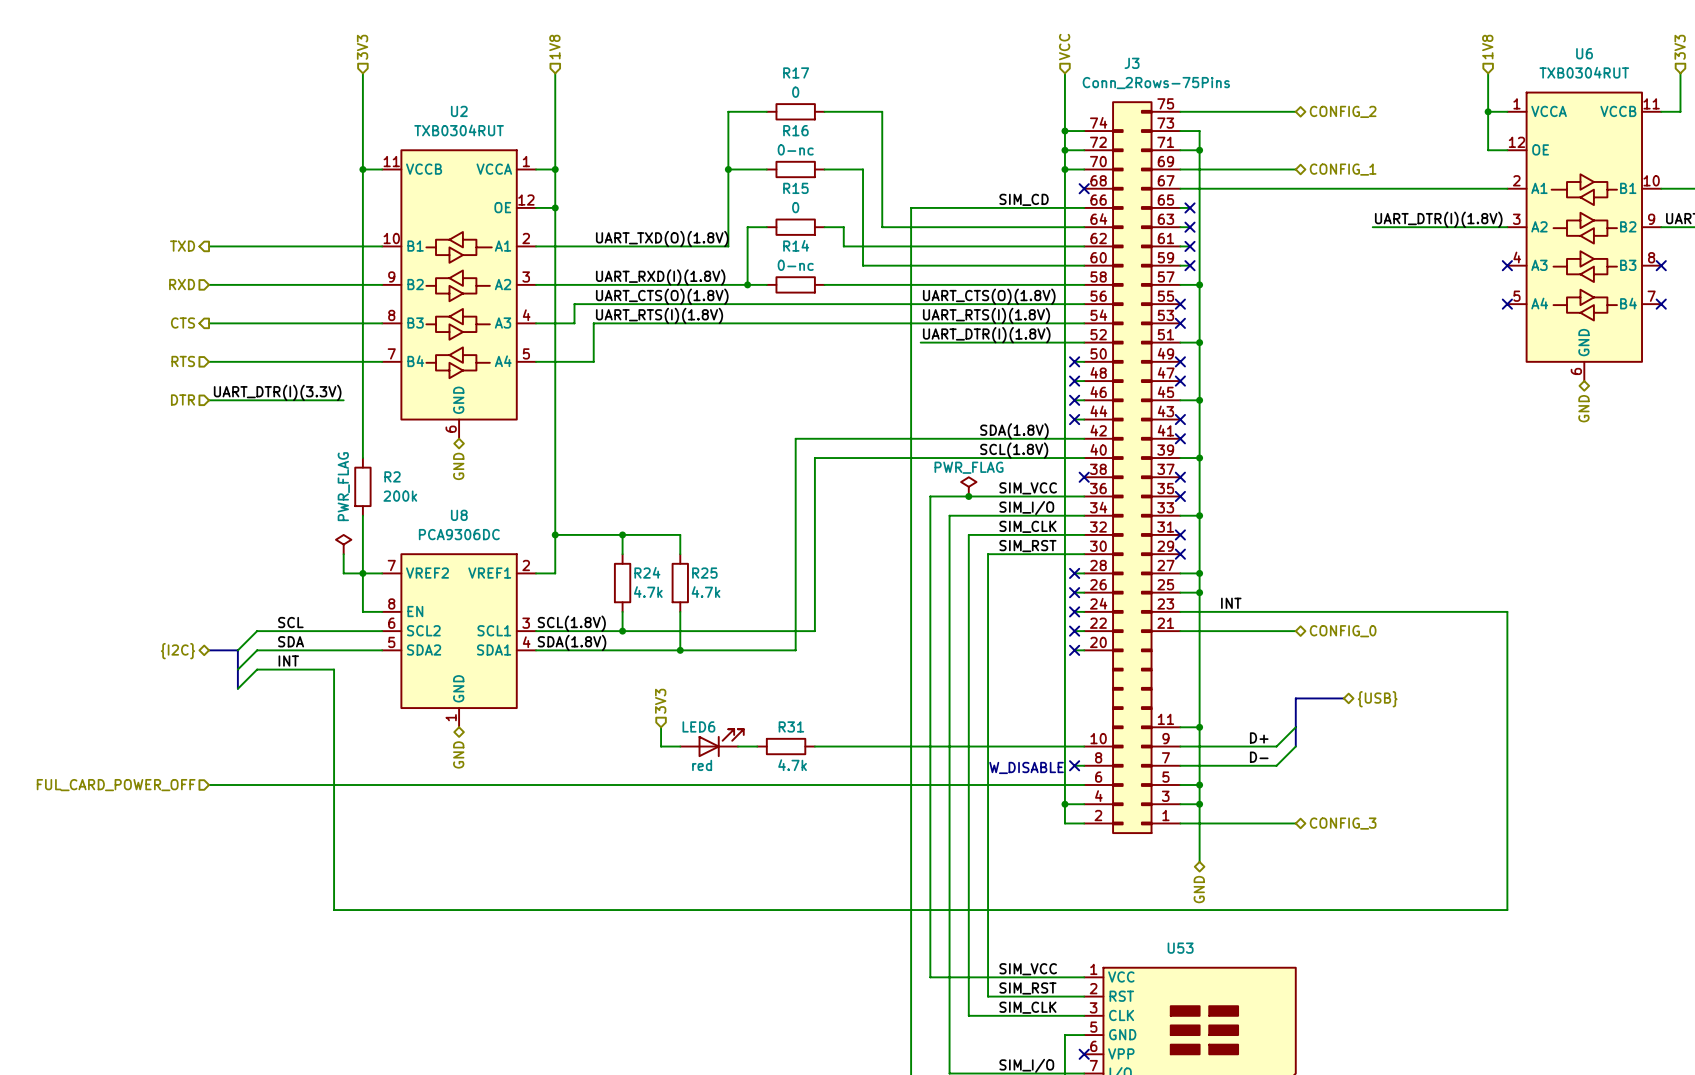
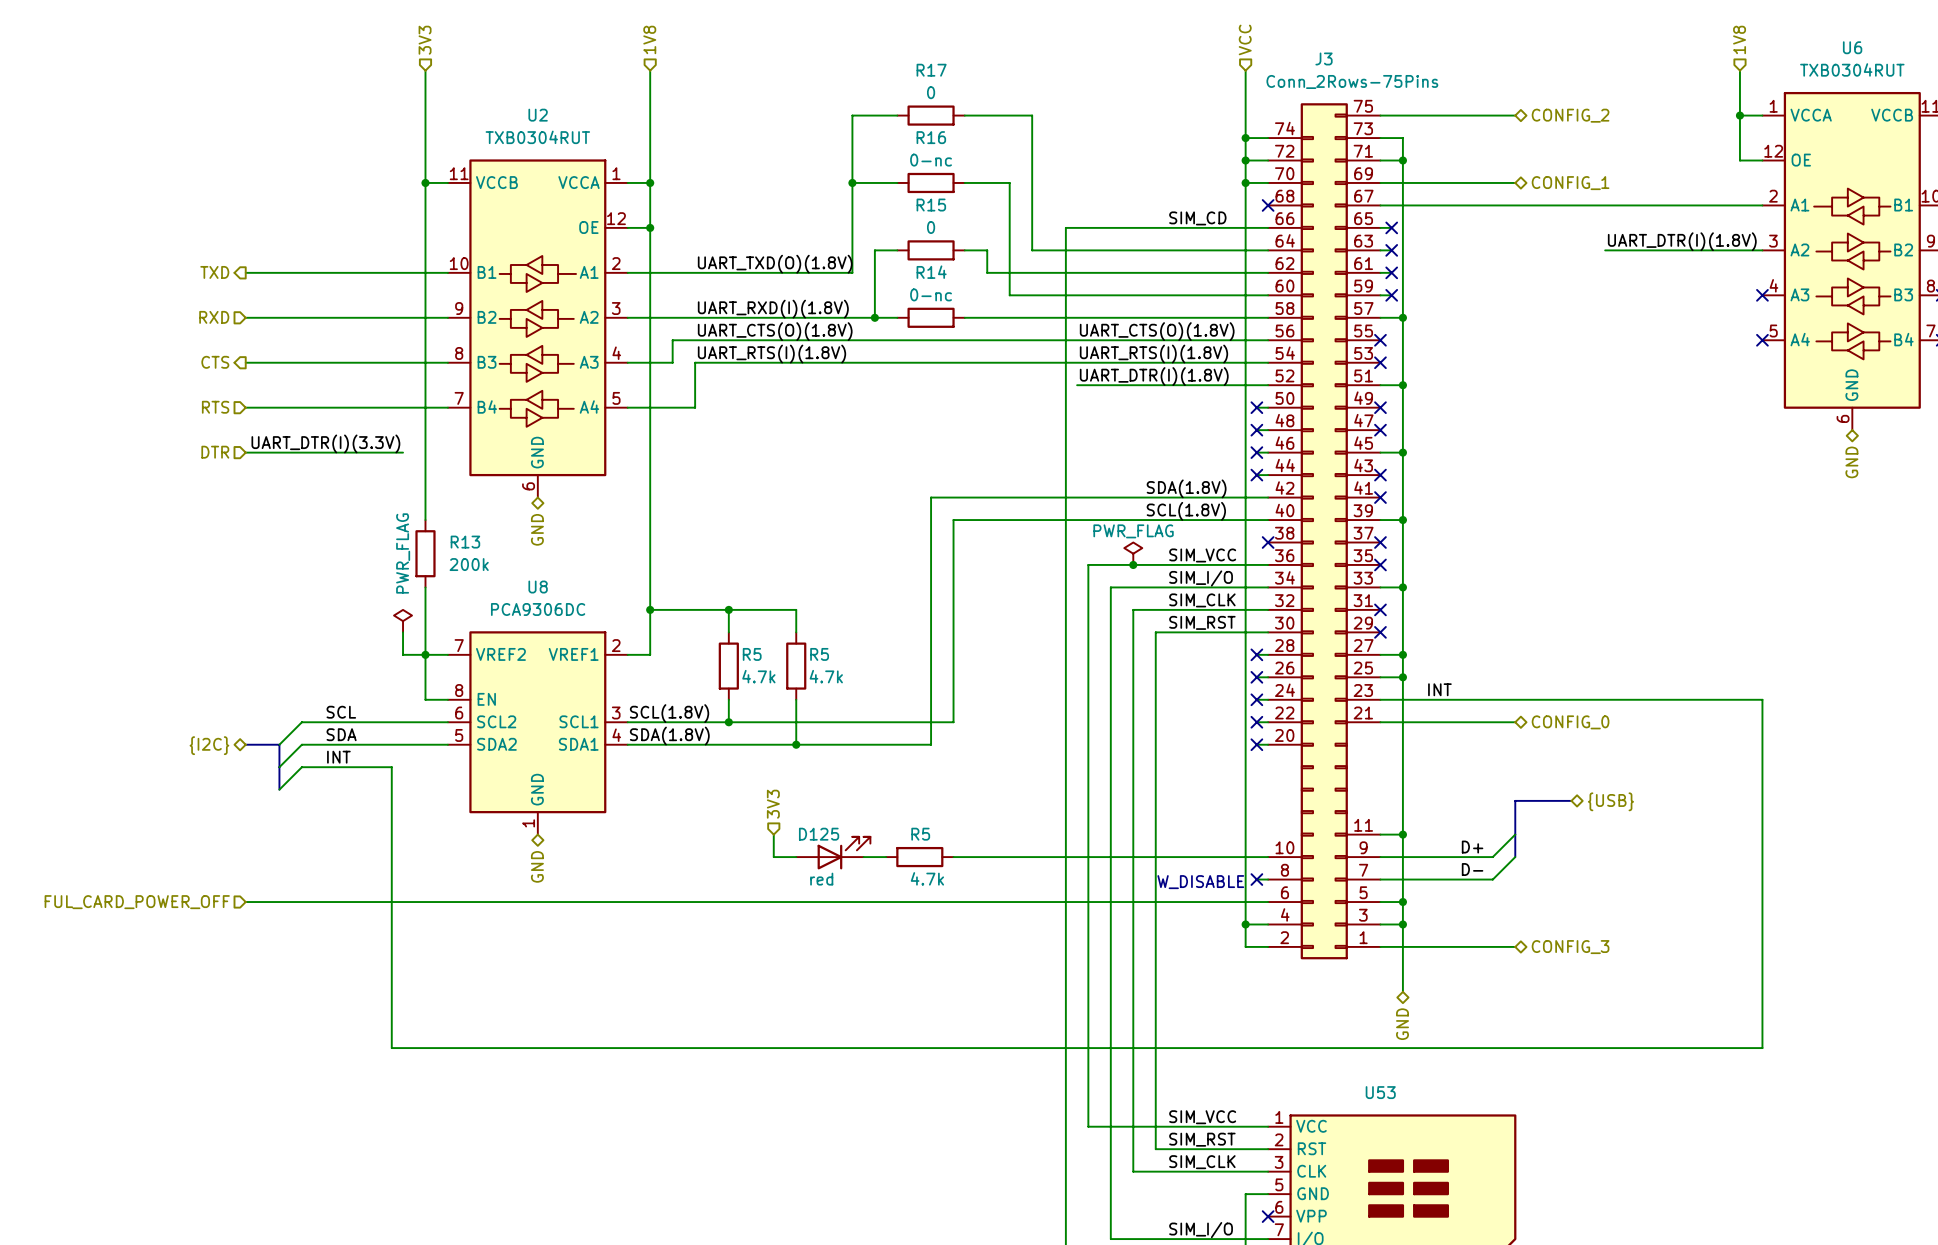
R2 name: R2 (392, 476) -> R13 (465, 542)
R24 name: R24 (647, 572) -> R5 (752, 654)
R25 name: R25 (704, 573) -> R5 (819, 654)
LED6 name: LED6 (698, 726) -> D125 (819, 834)
R31 name: R31 (791, 726) -> R5 (920, 834)

